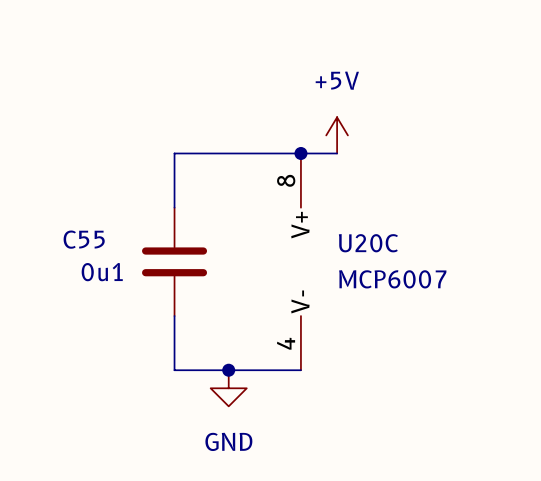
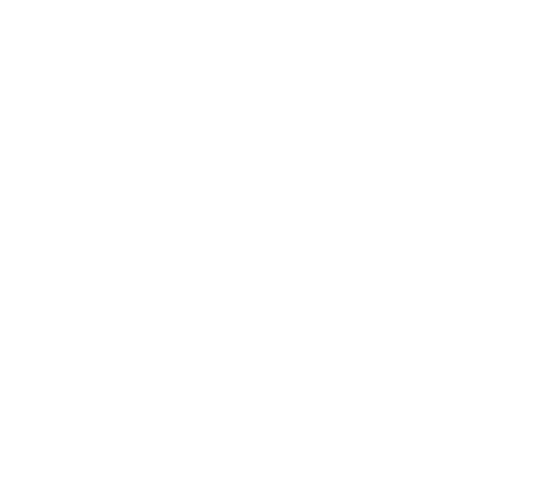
power symbol: +5V (337, 135) -> none
junction: (300, 153) -> none
wire: (337, 153) (174, 153) (174, 207) -> none
C55: 0u1 (174, 261) -> none
U20C: MCP6007 (300, 261) -> none
wire: (174, 316) (174, 370) (300, 370) -> none
junction: (228, 370) -> none
power symbol: GND (228, 388) -> none

